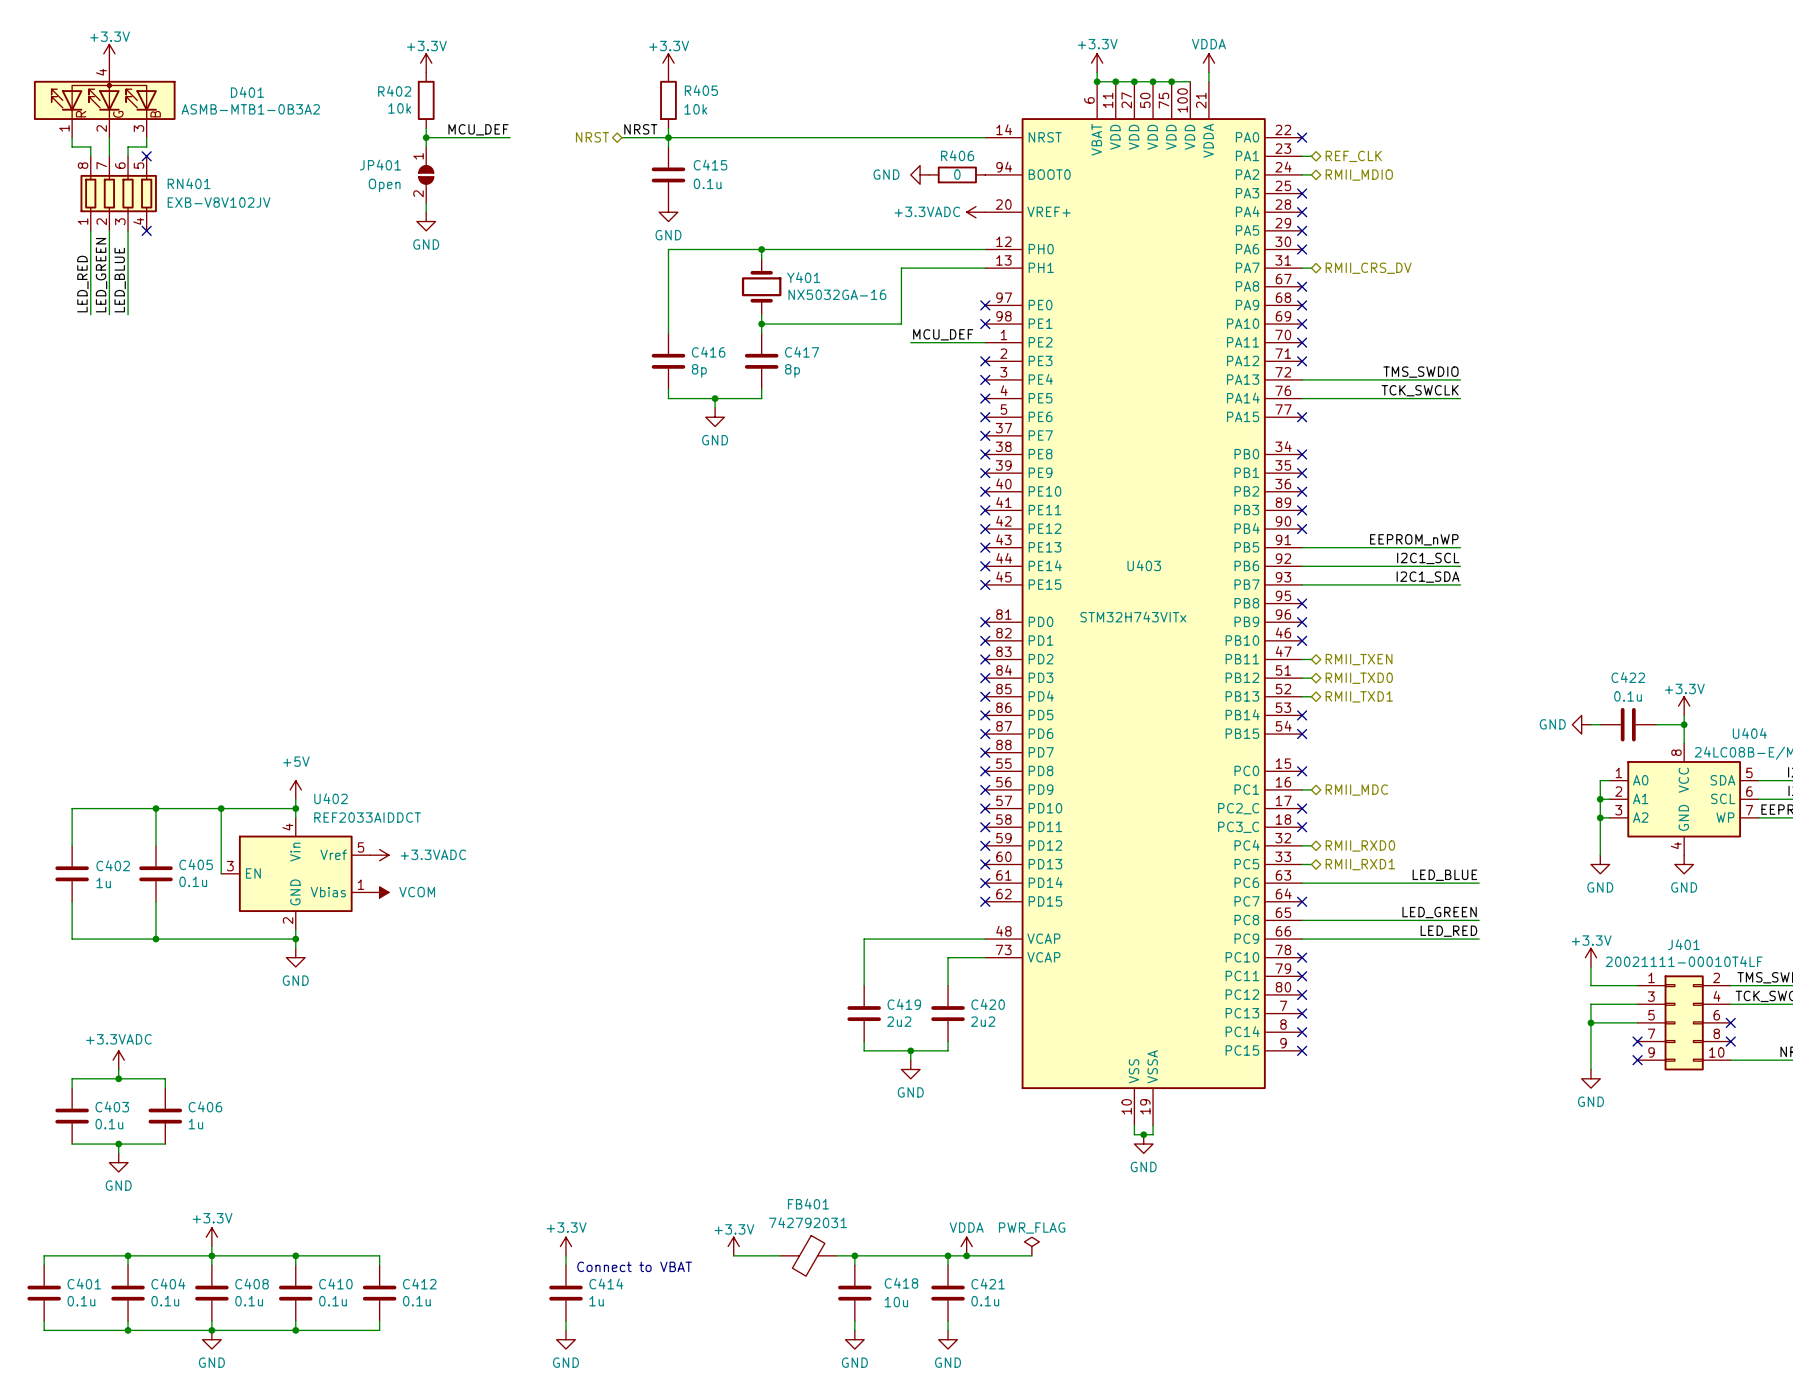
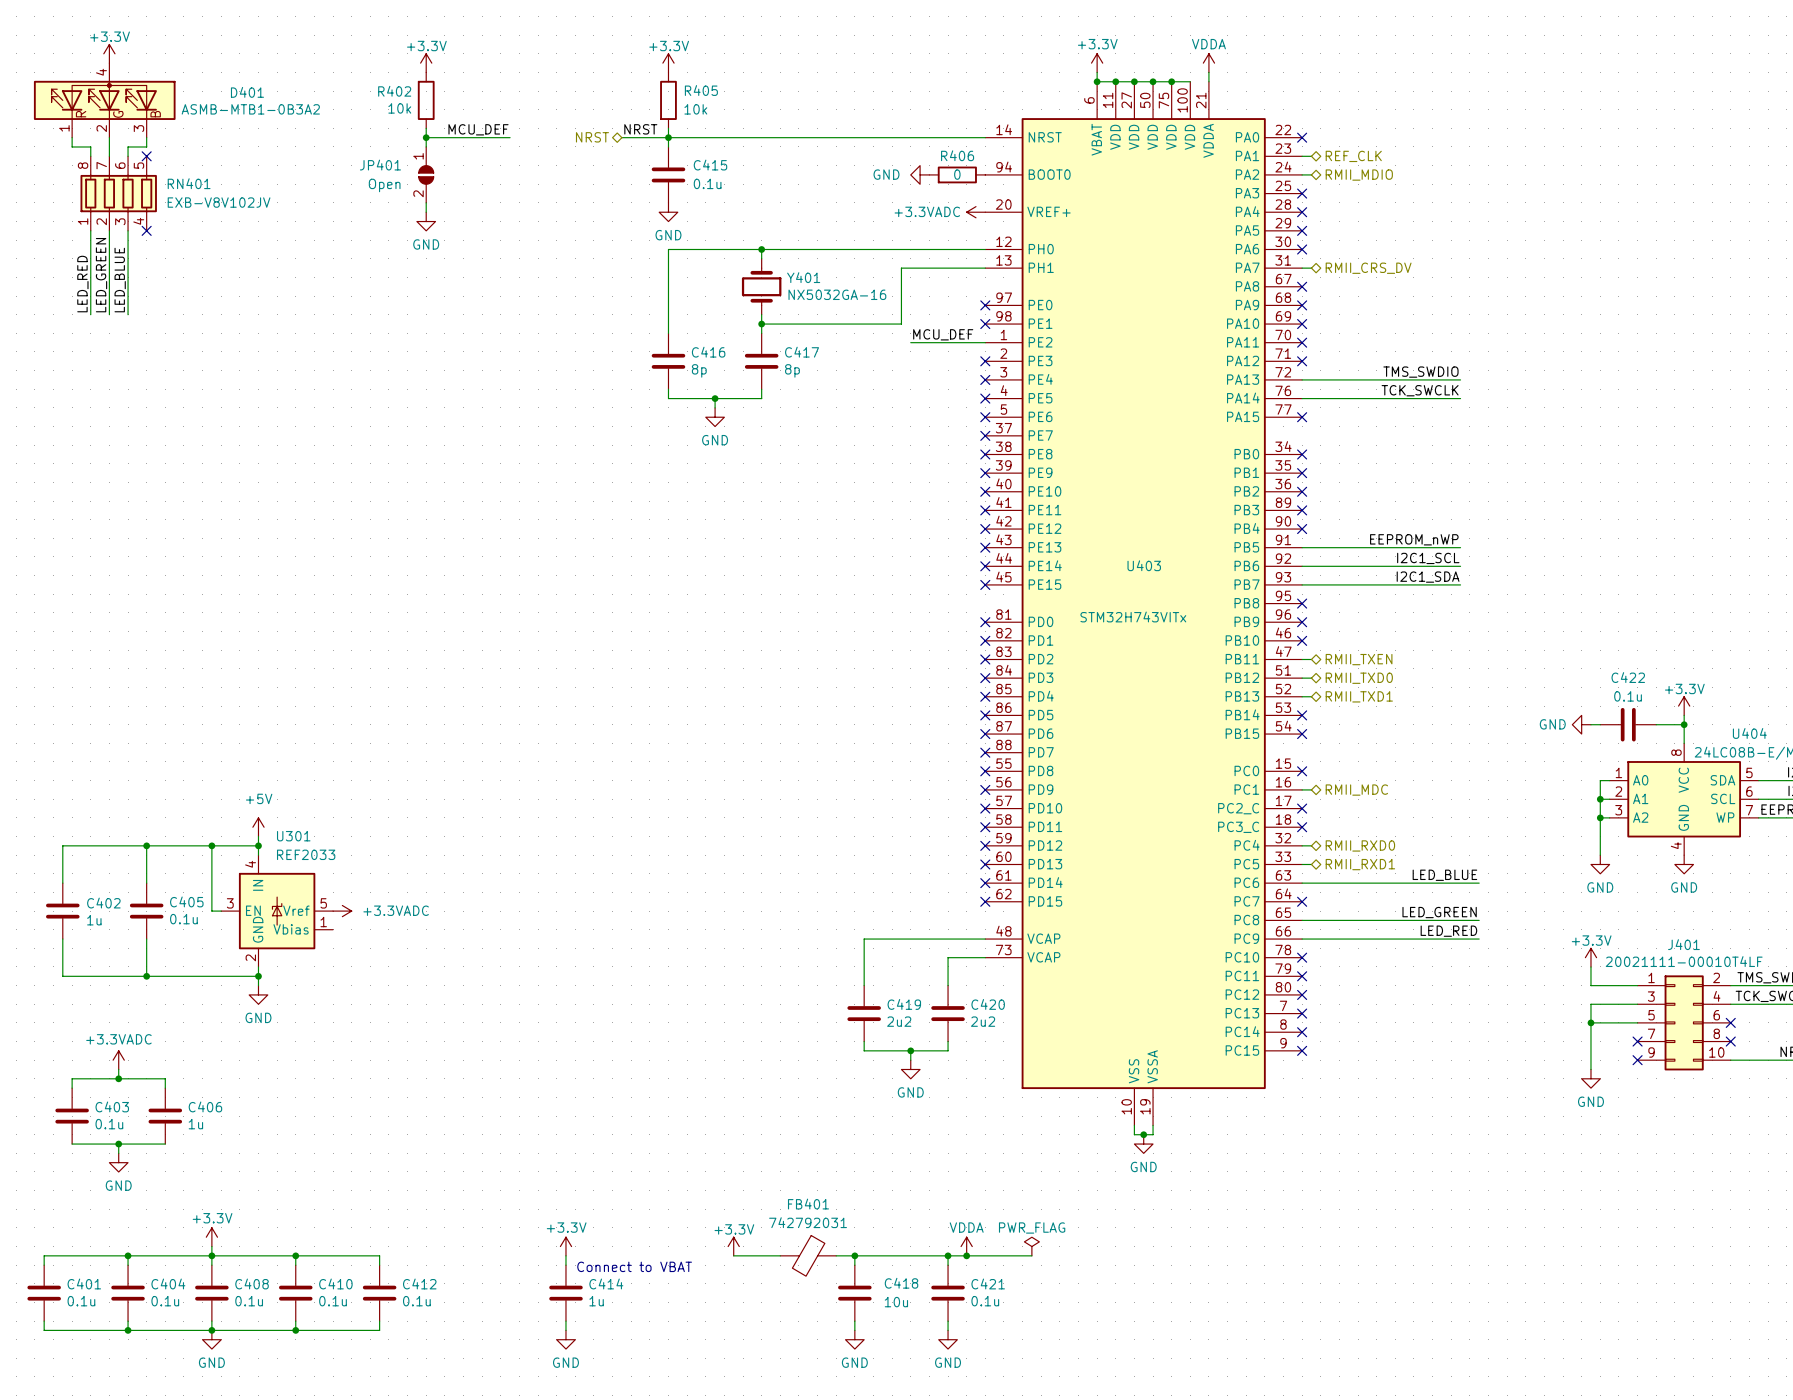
power symbol position: +5V (295, 789) -> +5V (258, 827)
wire: (155, 808) (155, 845) -> (146, 845) (146, 883)
junction: (155, 808) -> none
wire: (221, 808) (221, 873) -> none
junction: (221, 808) -> none
wire: (295, 808) (72, 808) (72, 845) -> none
junction: (295, 808) -> none
junction: none -> (146, 845)
wire: none -> (211, 845) (211, 911) (221, 911)
junction: none -> (211, 845)
wire: none -> (258, 845) (62, 845) (62, 883)
junction: none -> (258, 845)
power symbol position: +3.3VADC (379, 855) -> +3.3VADC (342, 911)
C402 position: (72, 873) -> (62, 911)
C405 position: (155, 873) -> (146, 911)
U402: REF2033AIDDCT (295, 873) -> none
power symbol: VCOM (379, 892) -> none
wire: (72, 901) (72, 939) (295, 939) -> none
wire: (155, 901) (155, 939) -> (146, 939) (146, 976)
U301: none -> REF2033 (277, 911)
wire: none -> (62, 939) (62, 976) (258, 976)
junction position: (155, 939) -> (146, 976)
junction: (295, 939) -> none
power symbol position: GND (295, 957) -> GND (258, 994)
junction: none -> (258, 976)

